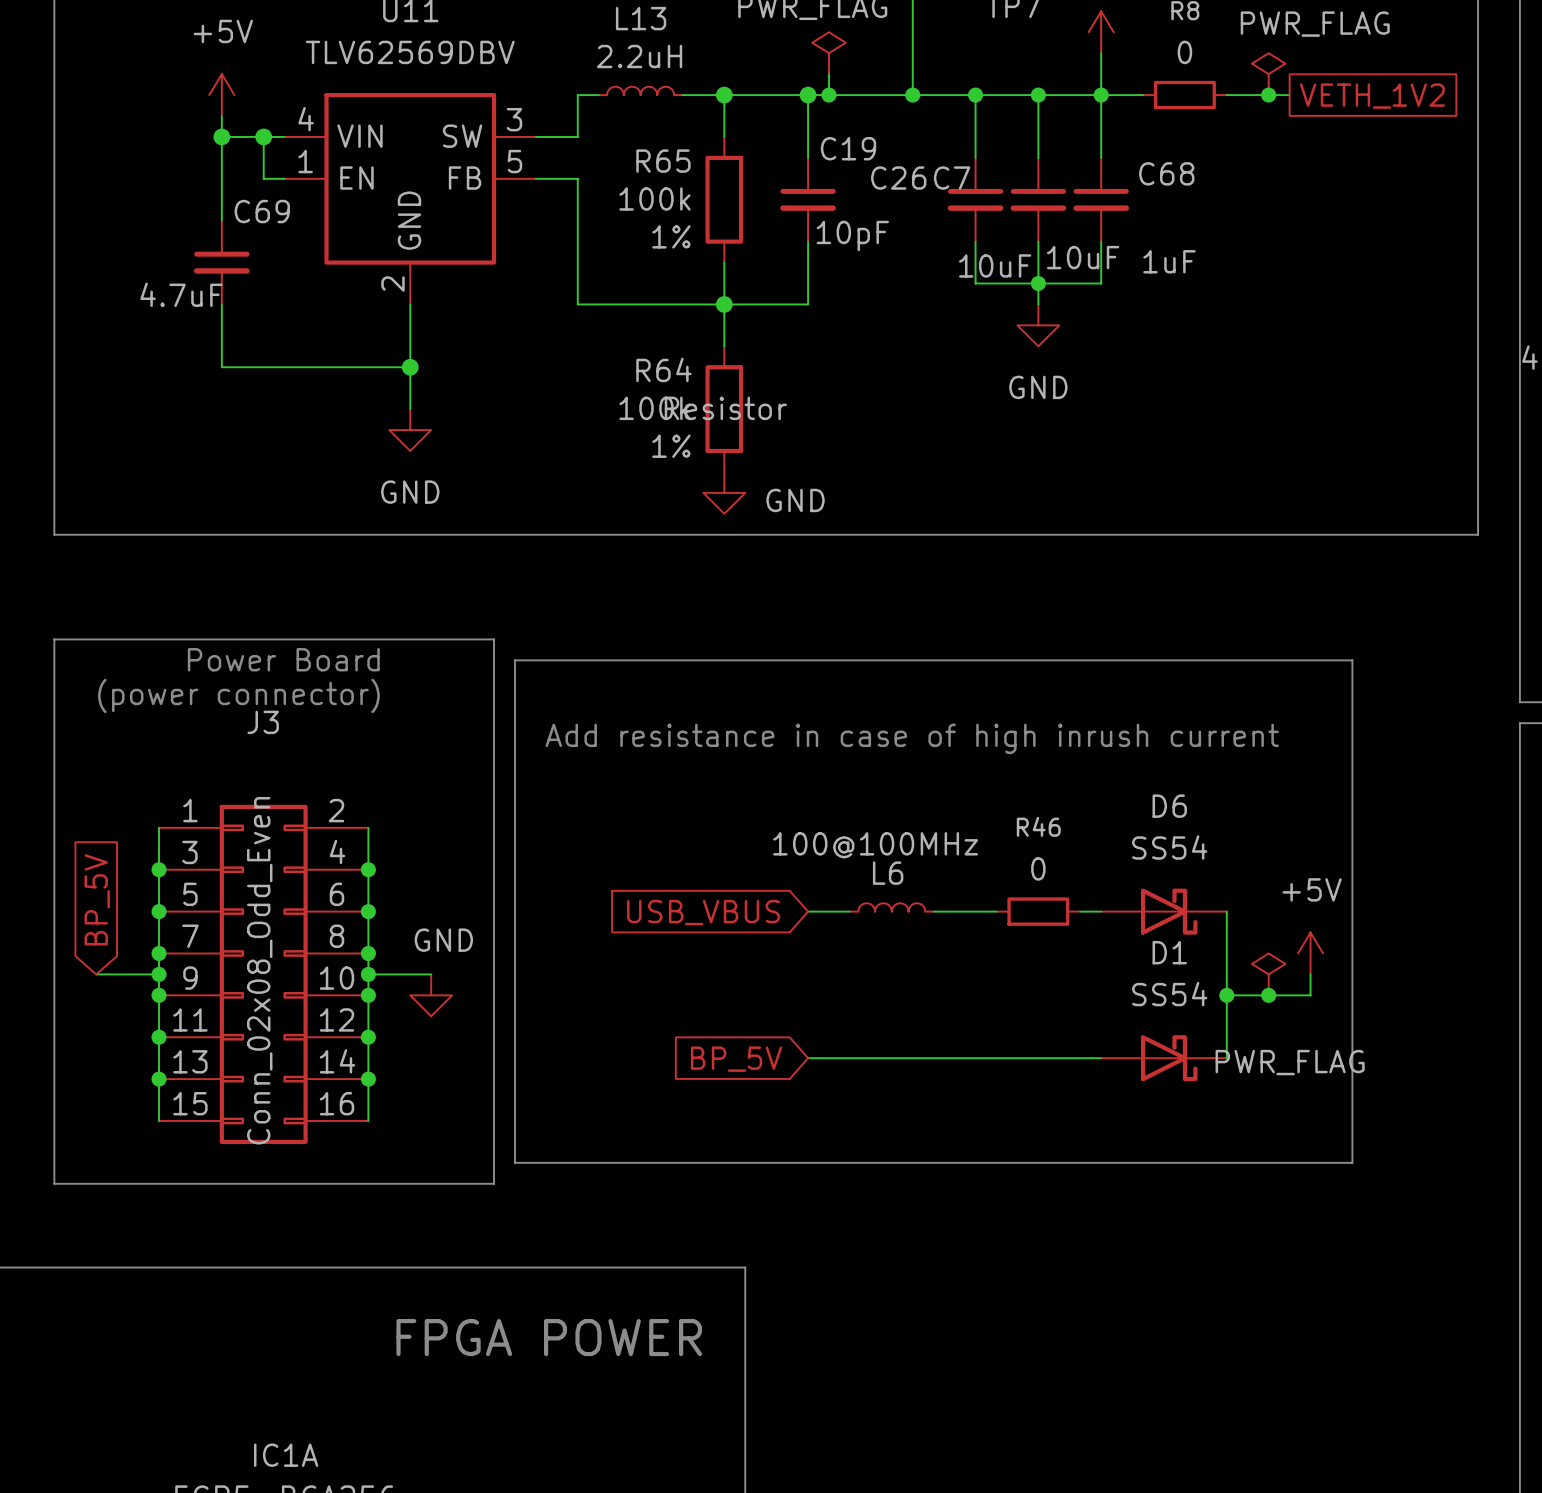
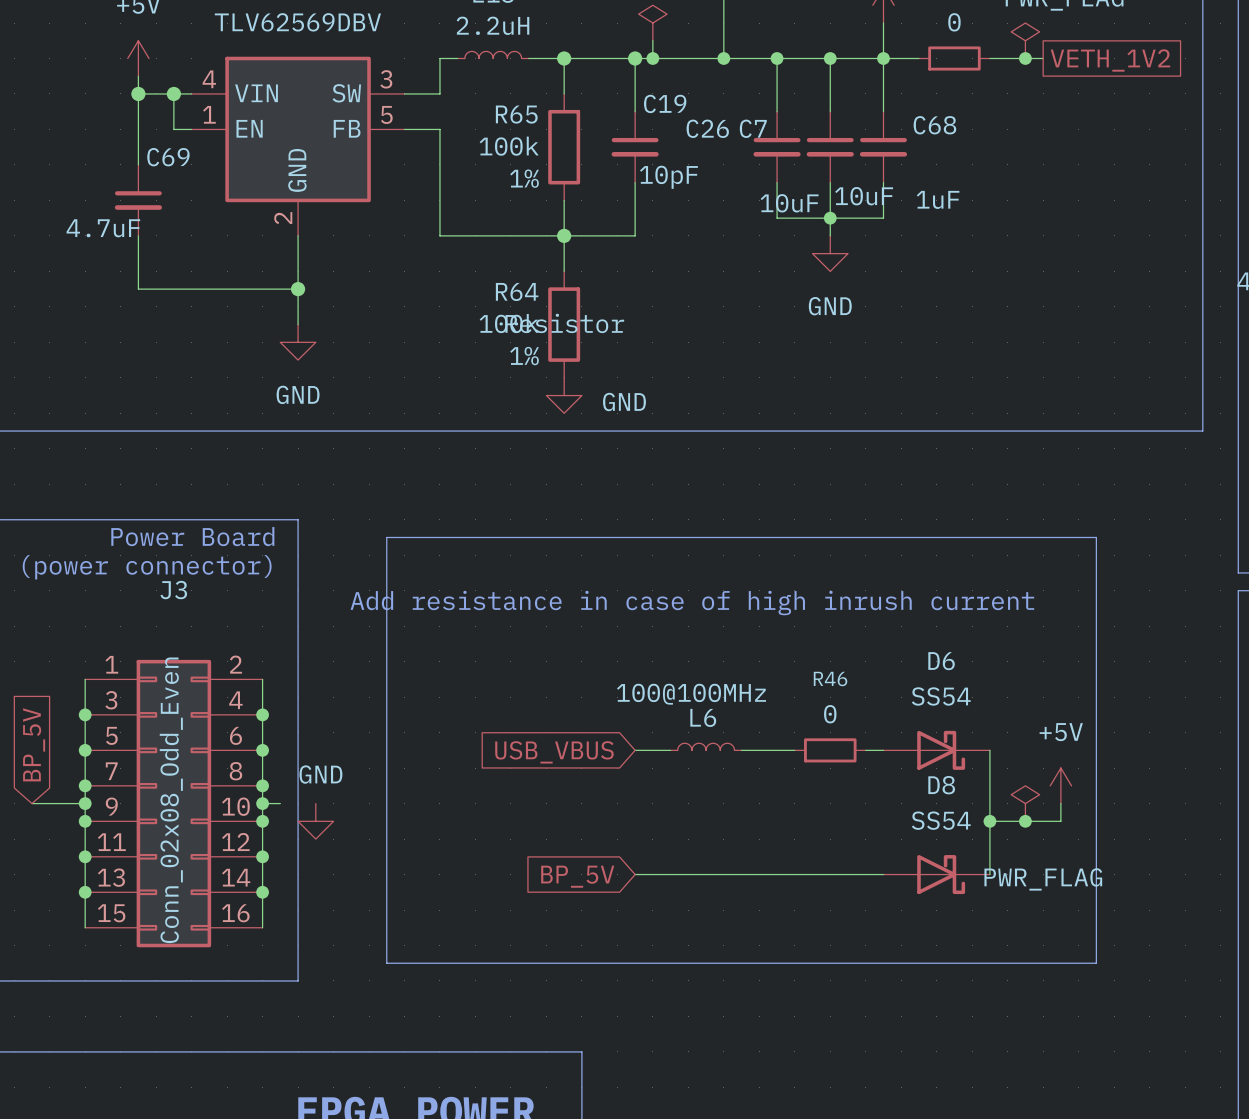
line: (410, 639) (494, 639) (494, 1183) (410, 1183) -> (298, 519) (298, 980)
D1 name: D1 (1169, 952) -> D8 (941, 785)
wire: (389, 974) (431, 974) -> none

